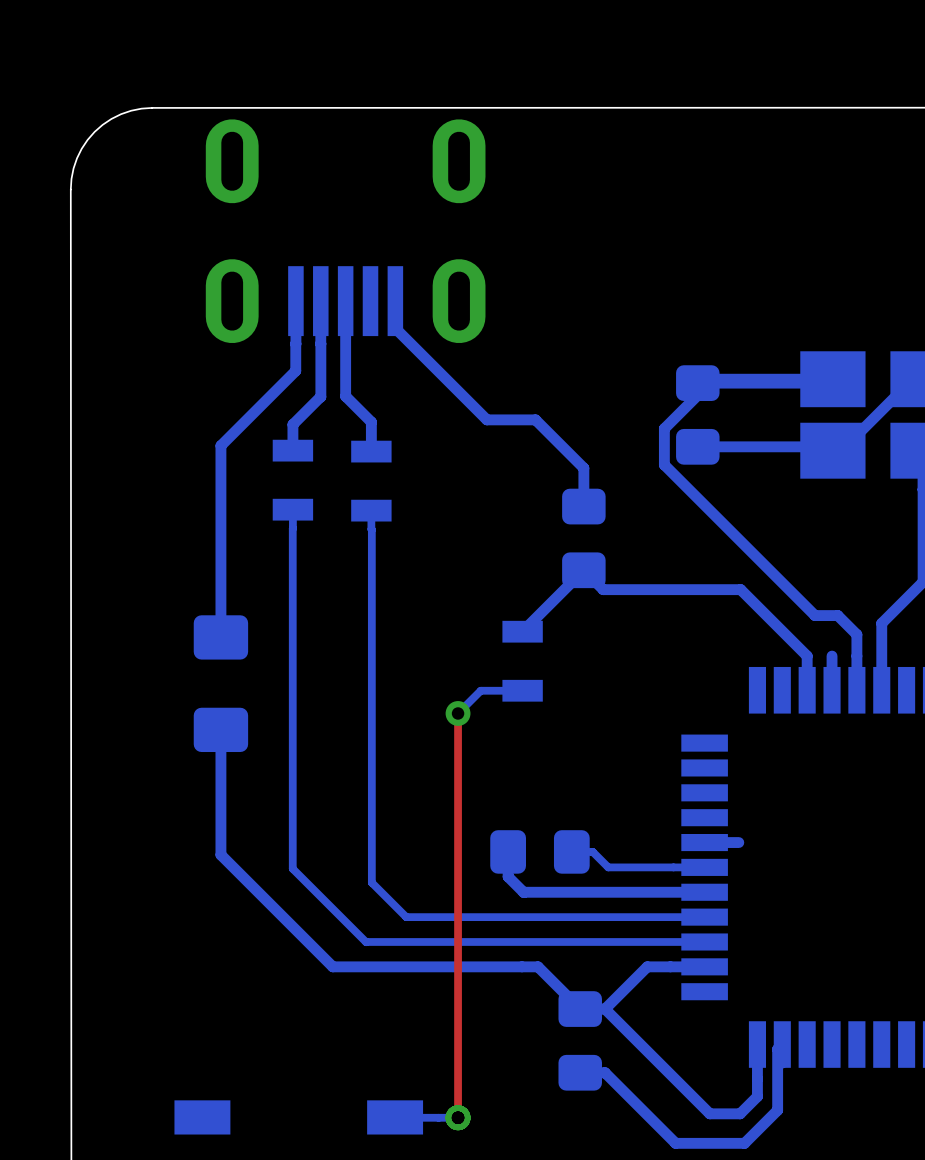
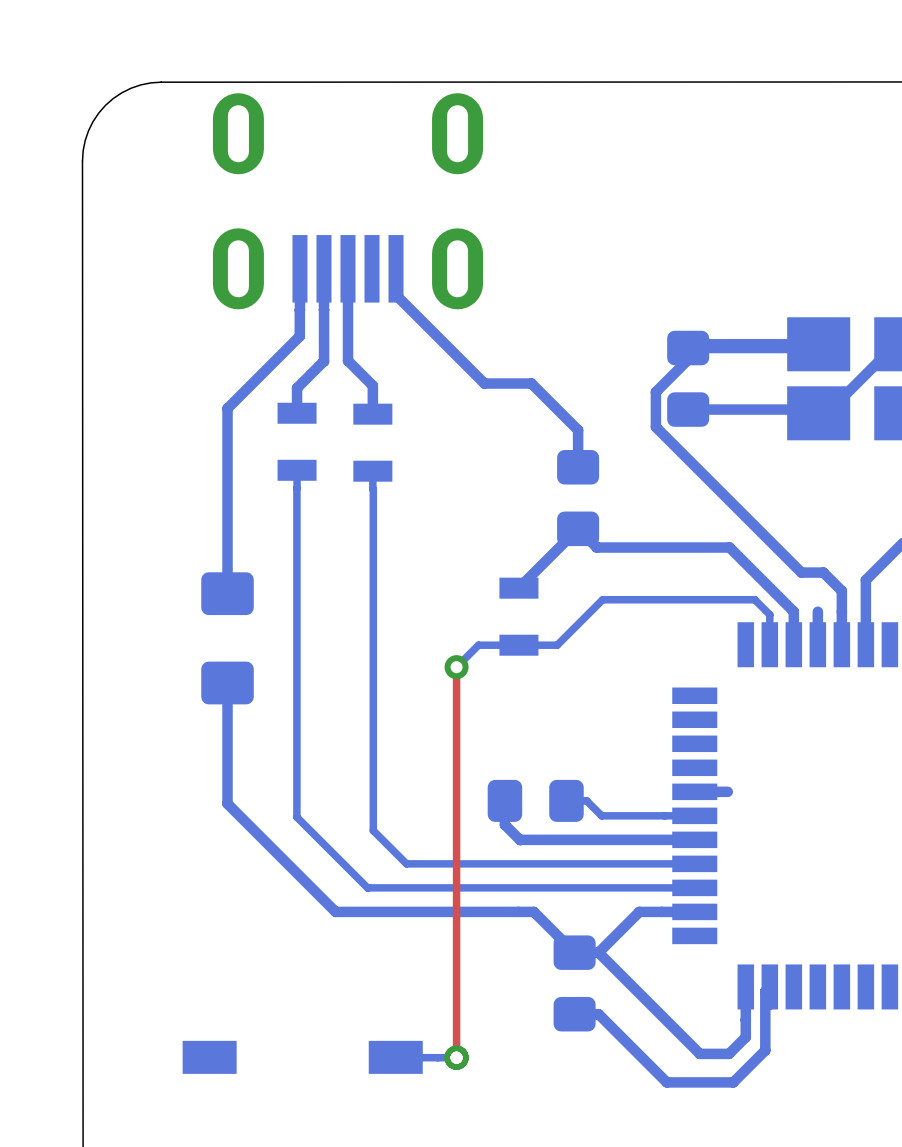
bottom track: none -> (769, 644) (769, 614) (754, 599) (602, 599) (557, 645) (518, 645)

